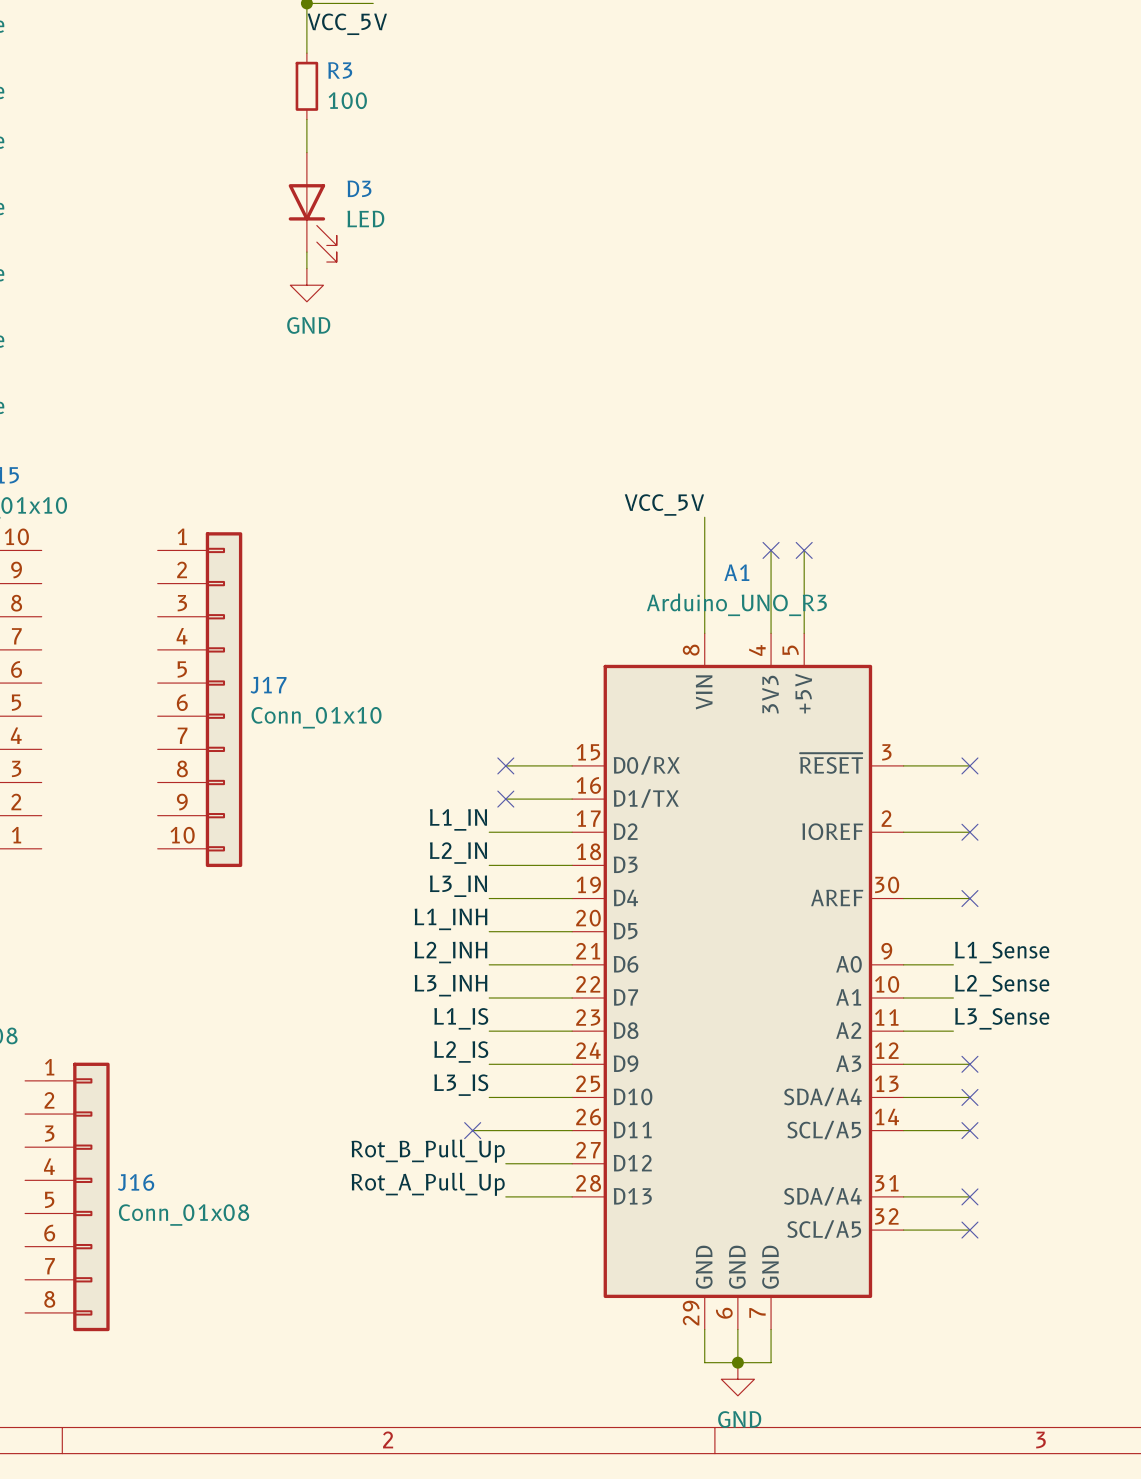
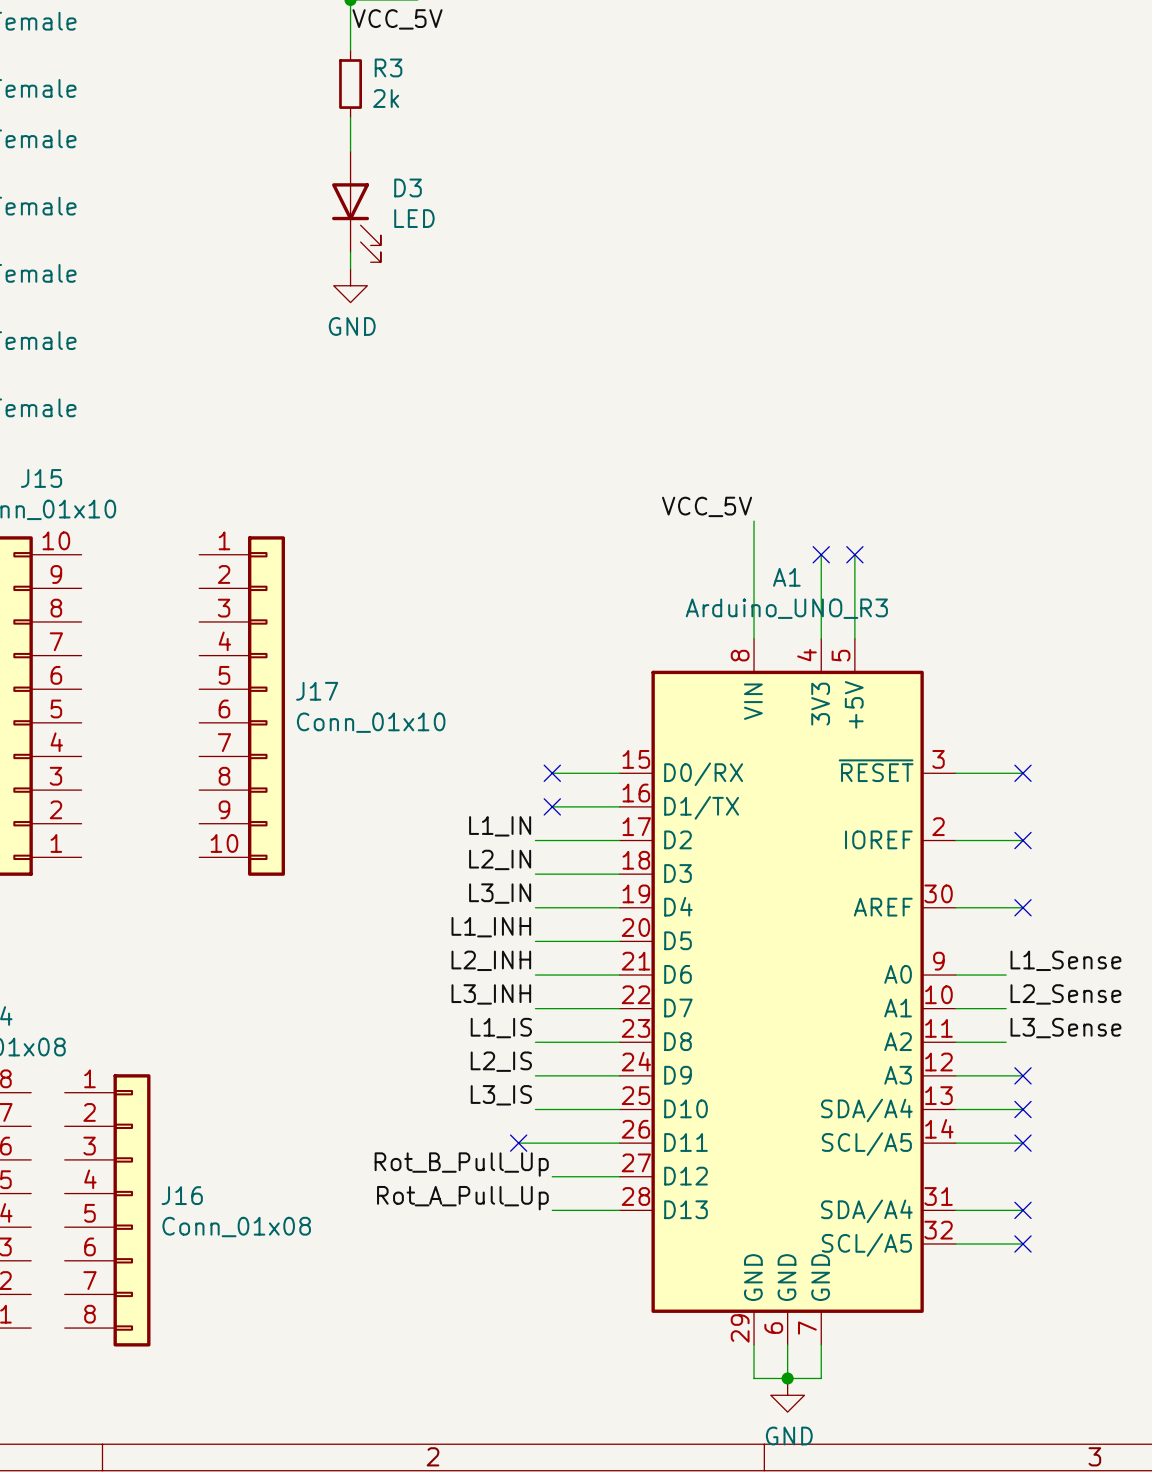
R3 value: 100 (347, 100) -> 2k (386, 98)

